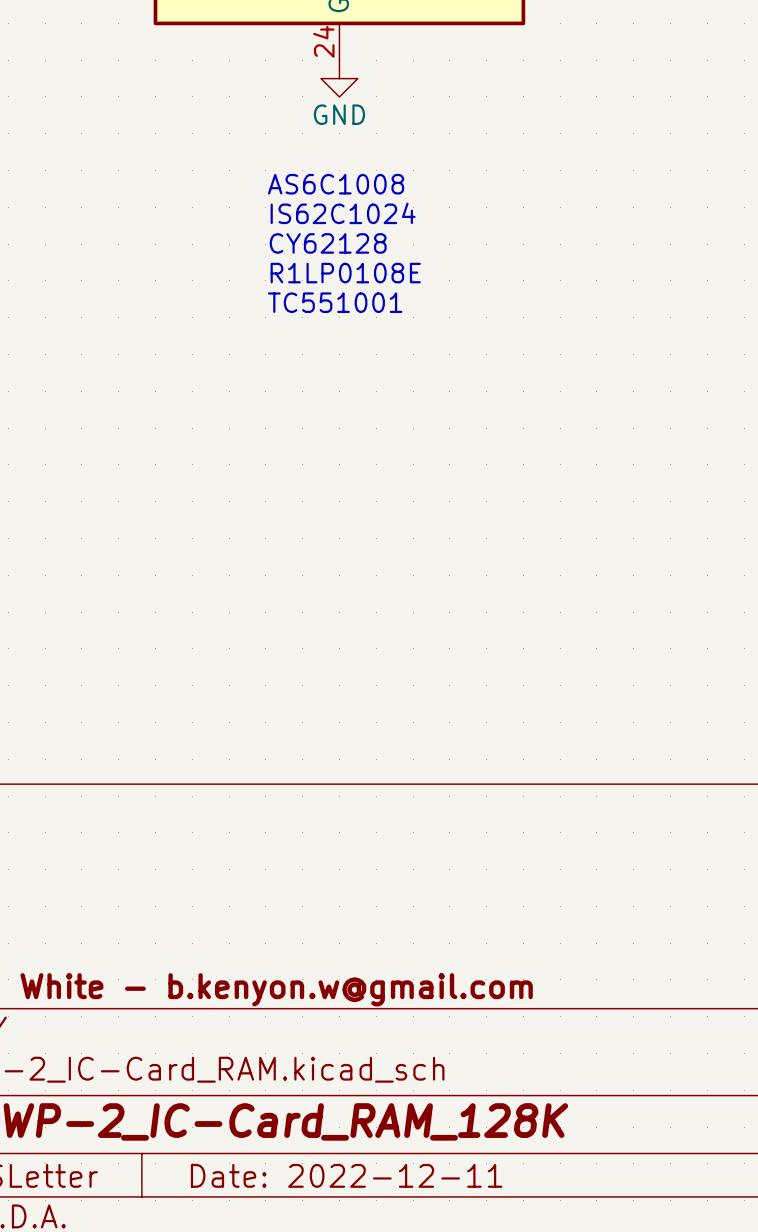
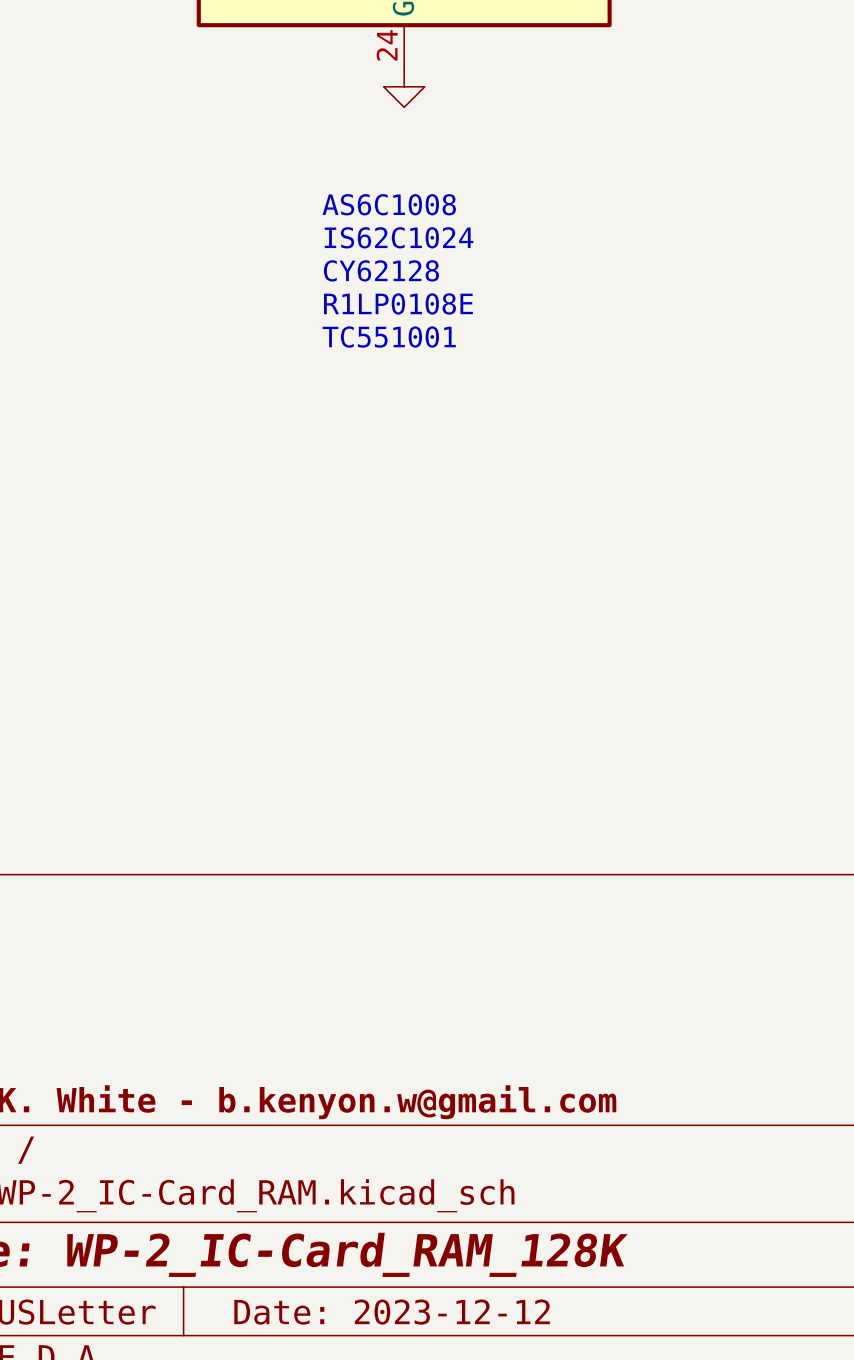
power symbol text: GND (339, 114) -> none
title block: Date: 2022-12-11 (346, 1175) -> Date: 2023-12-12 (392, 1312)

